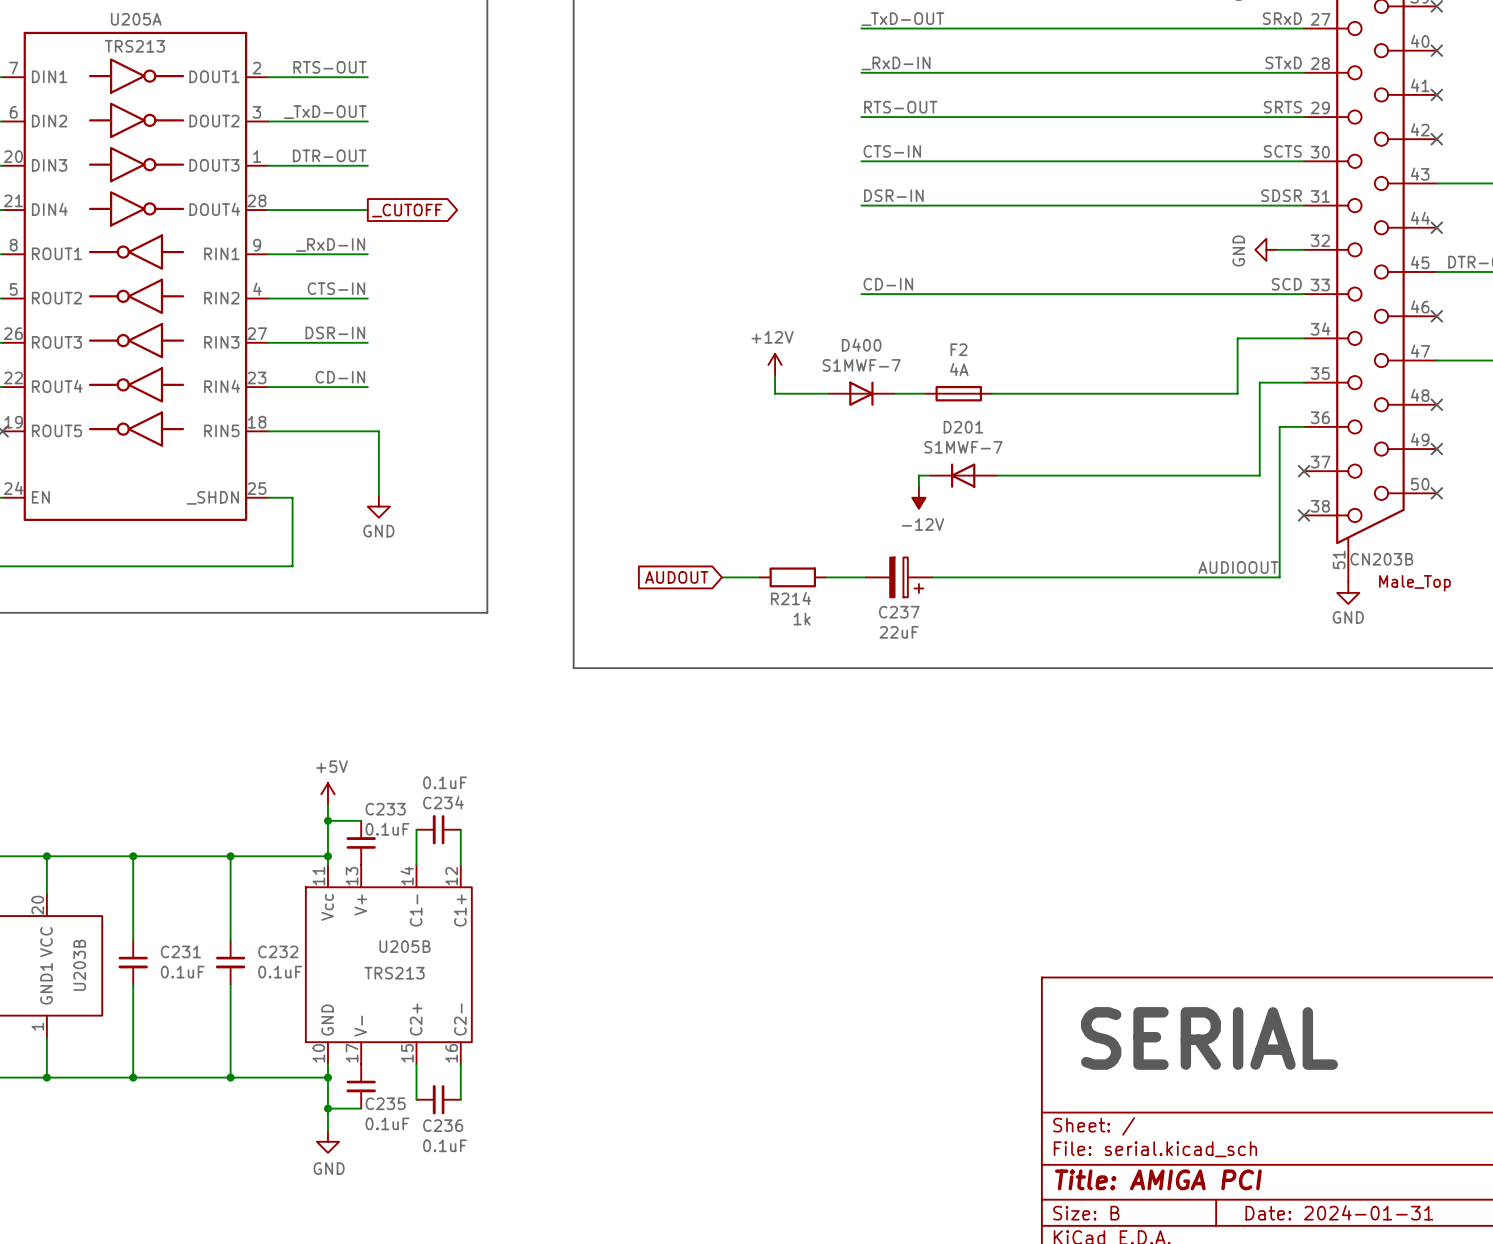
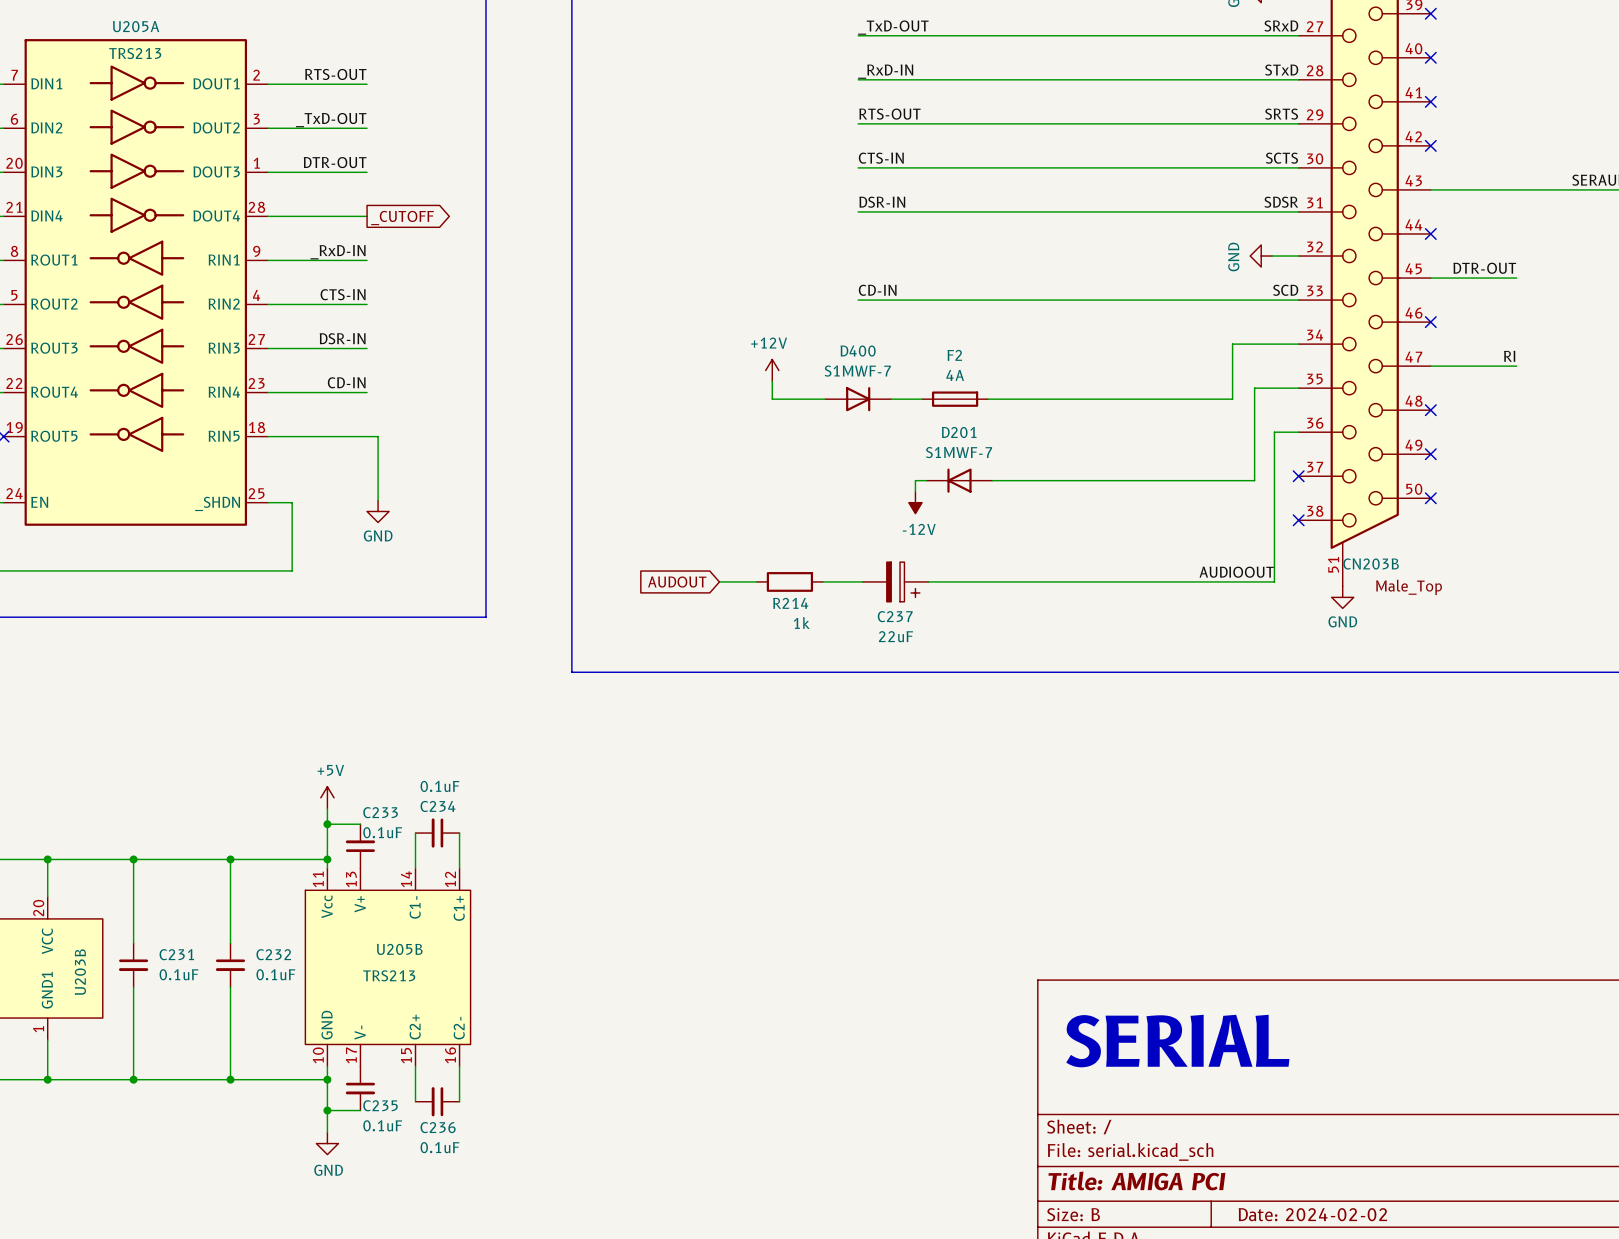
title block: Date: 2024-01-31 (1339, 1212) -> Date: 2024-02-02 (1312, 1214)

